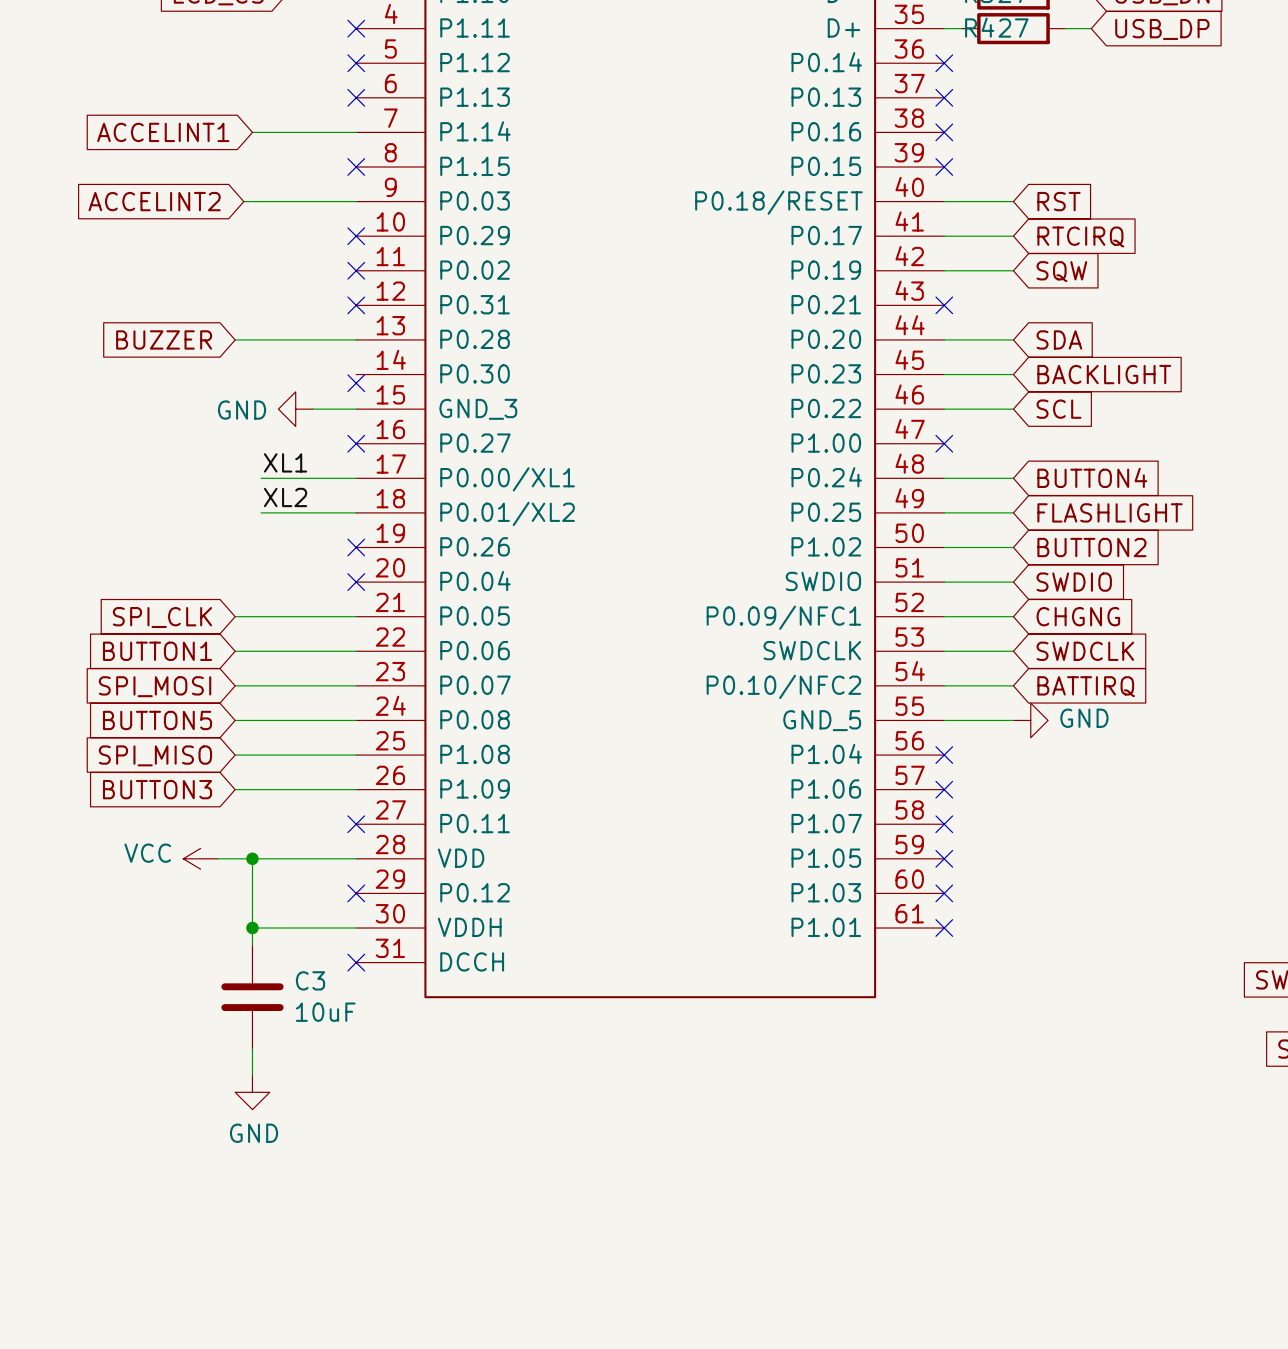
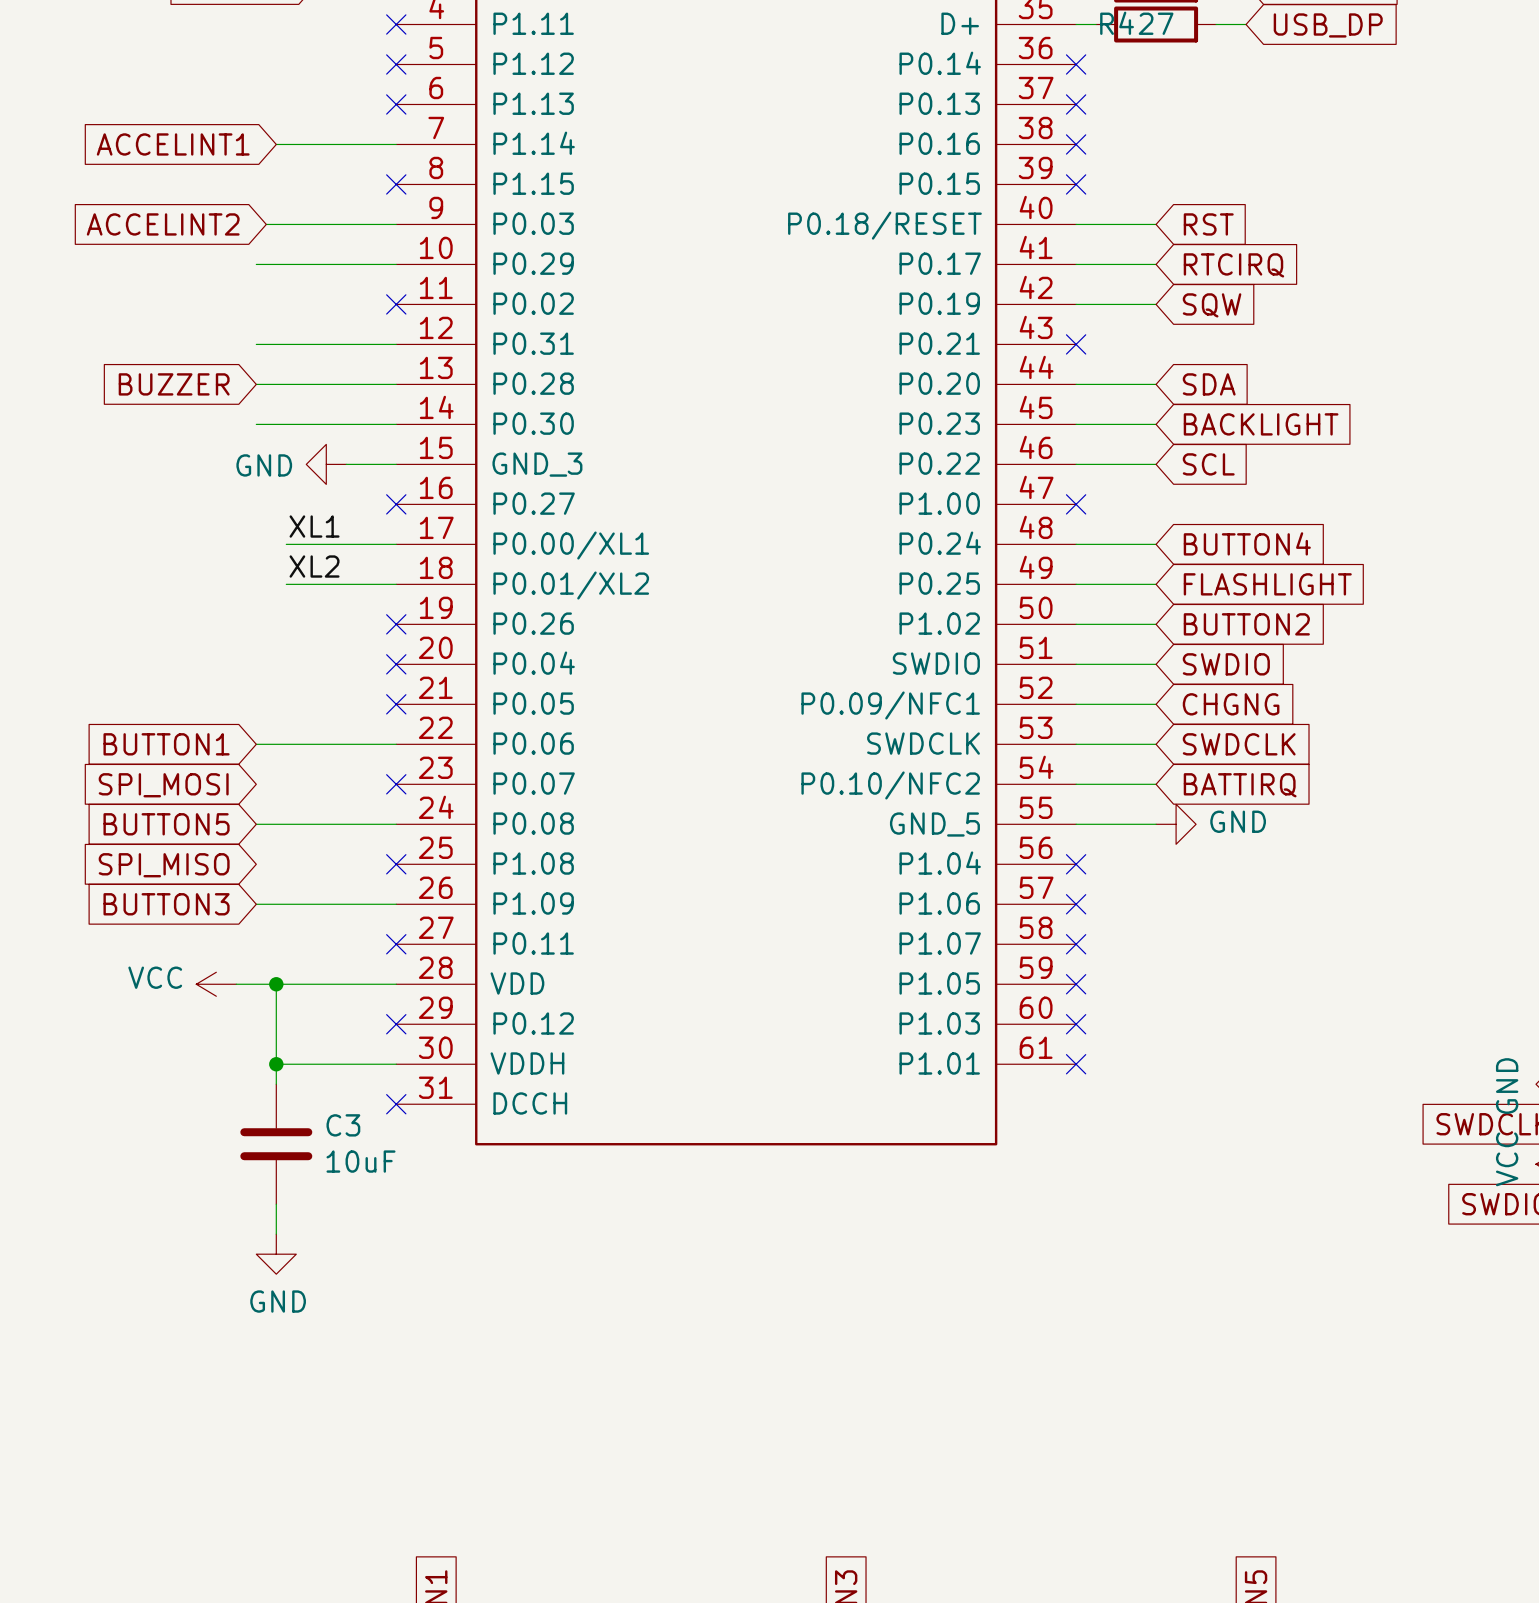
wire: none -> (256, 264) (396, 264)
no-connect mark: (356, 236) -> none
no-connect mark: (356, 305) -> none
no-connect mark: (356, 383) -> none
wire: (235, 616) (356, 616) -> (256, 344) (396, 344)
no-connect mark: none -> (396, 704)
global label: SPI_CLK (162, 617) -> none
wire: (235, 685) (356, 685) -> (256, 424) (396, 424)
no-connect mark: none -> (396, 784)
wire: (235, 755) (356, 755) -> none
no-connect mark: none -> (396, 864)

